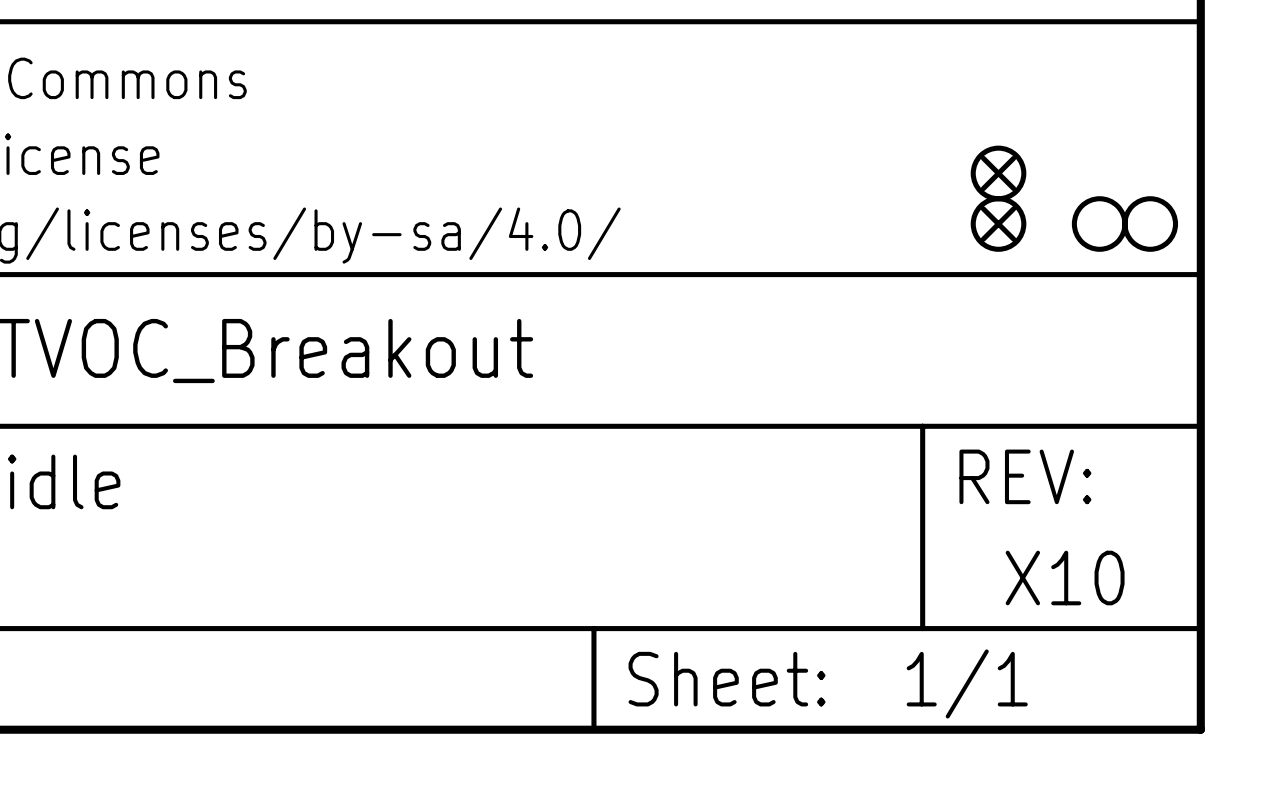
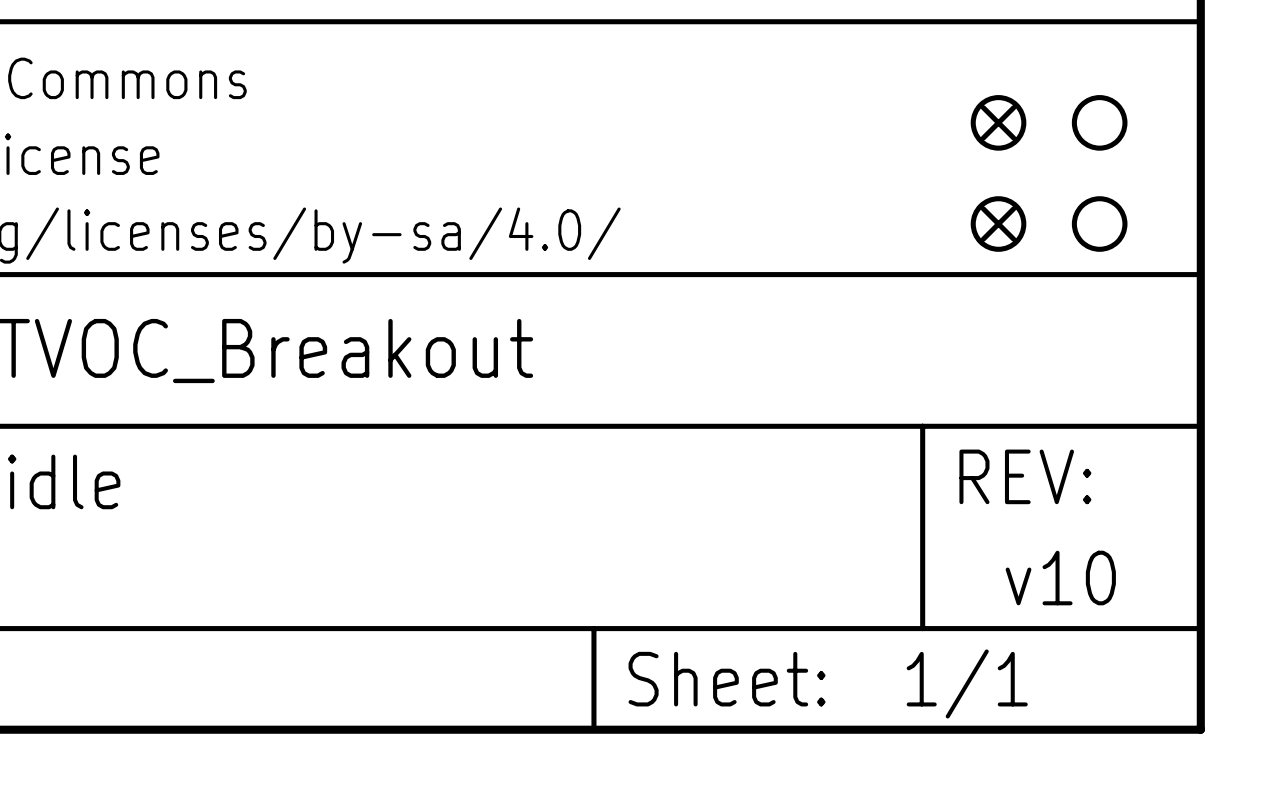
part position: (998, 173) -> (998, 122)
part position: (1150, 224) -> (1099, 122)
text: X10 (1065, 578) -> v10 (1060, 578)

